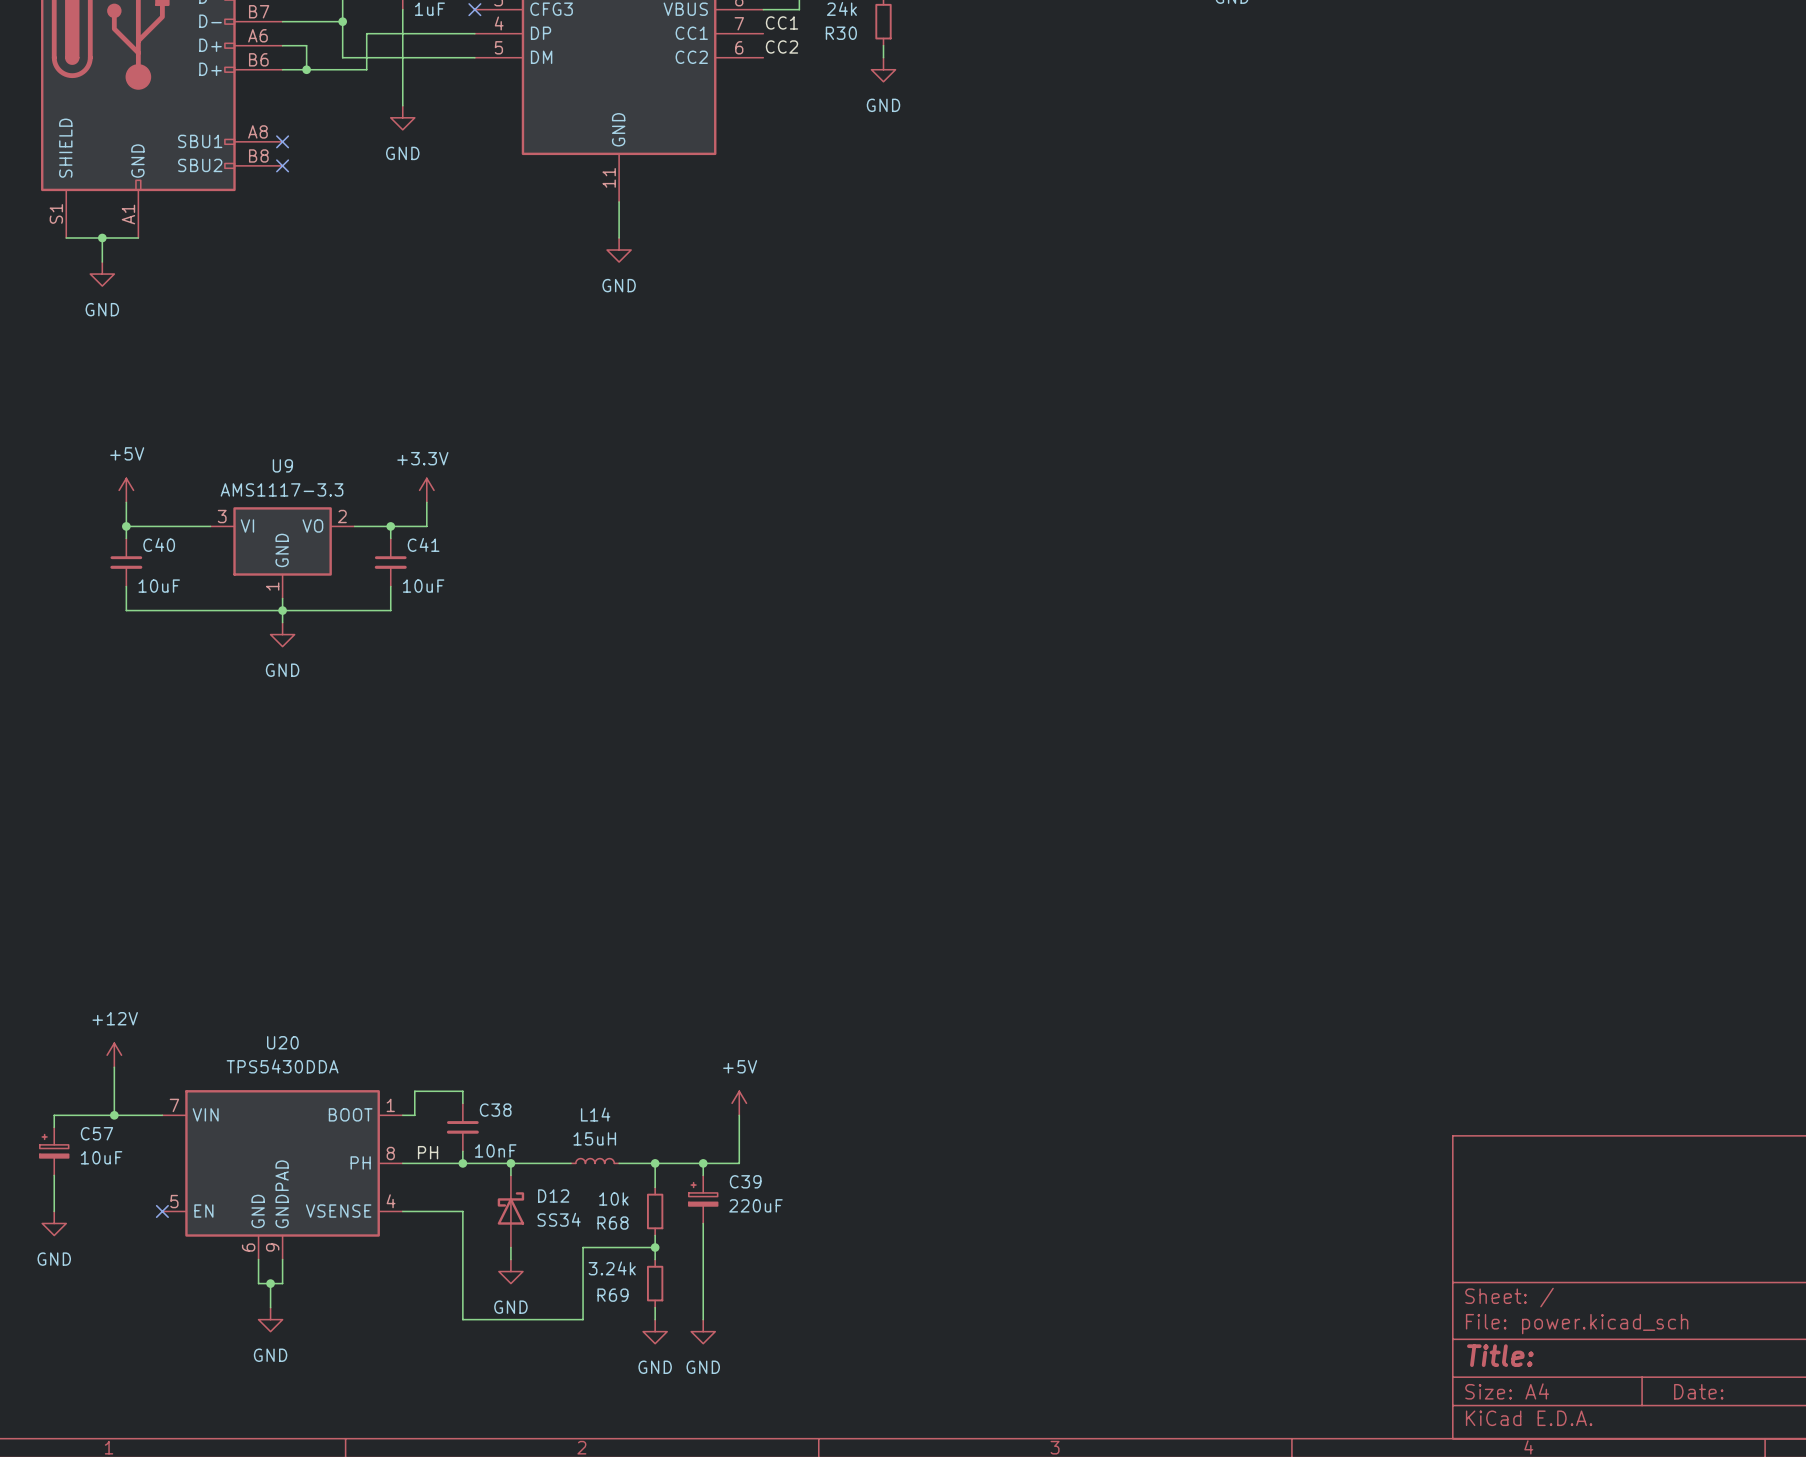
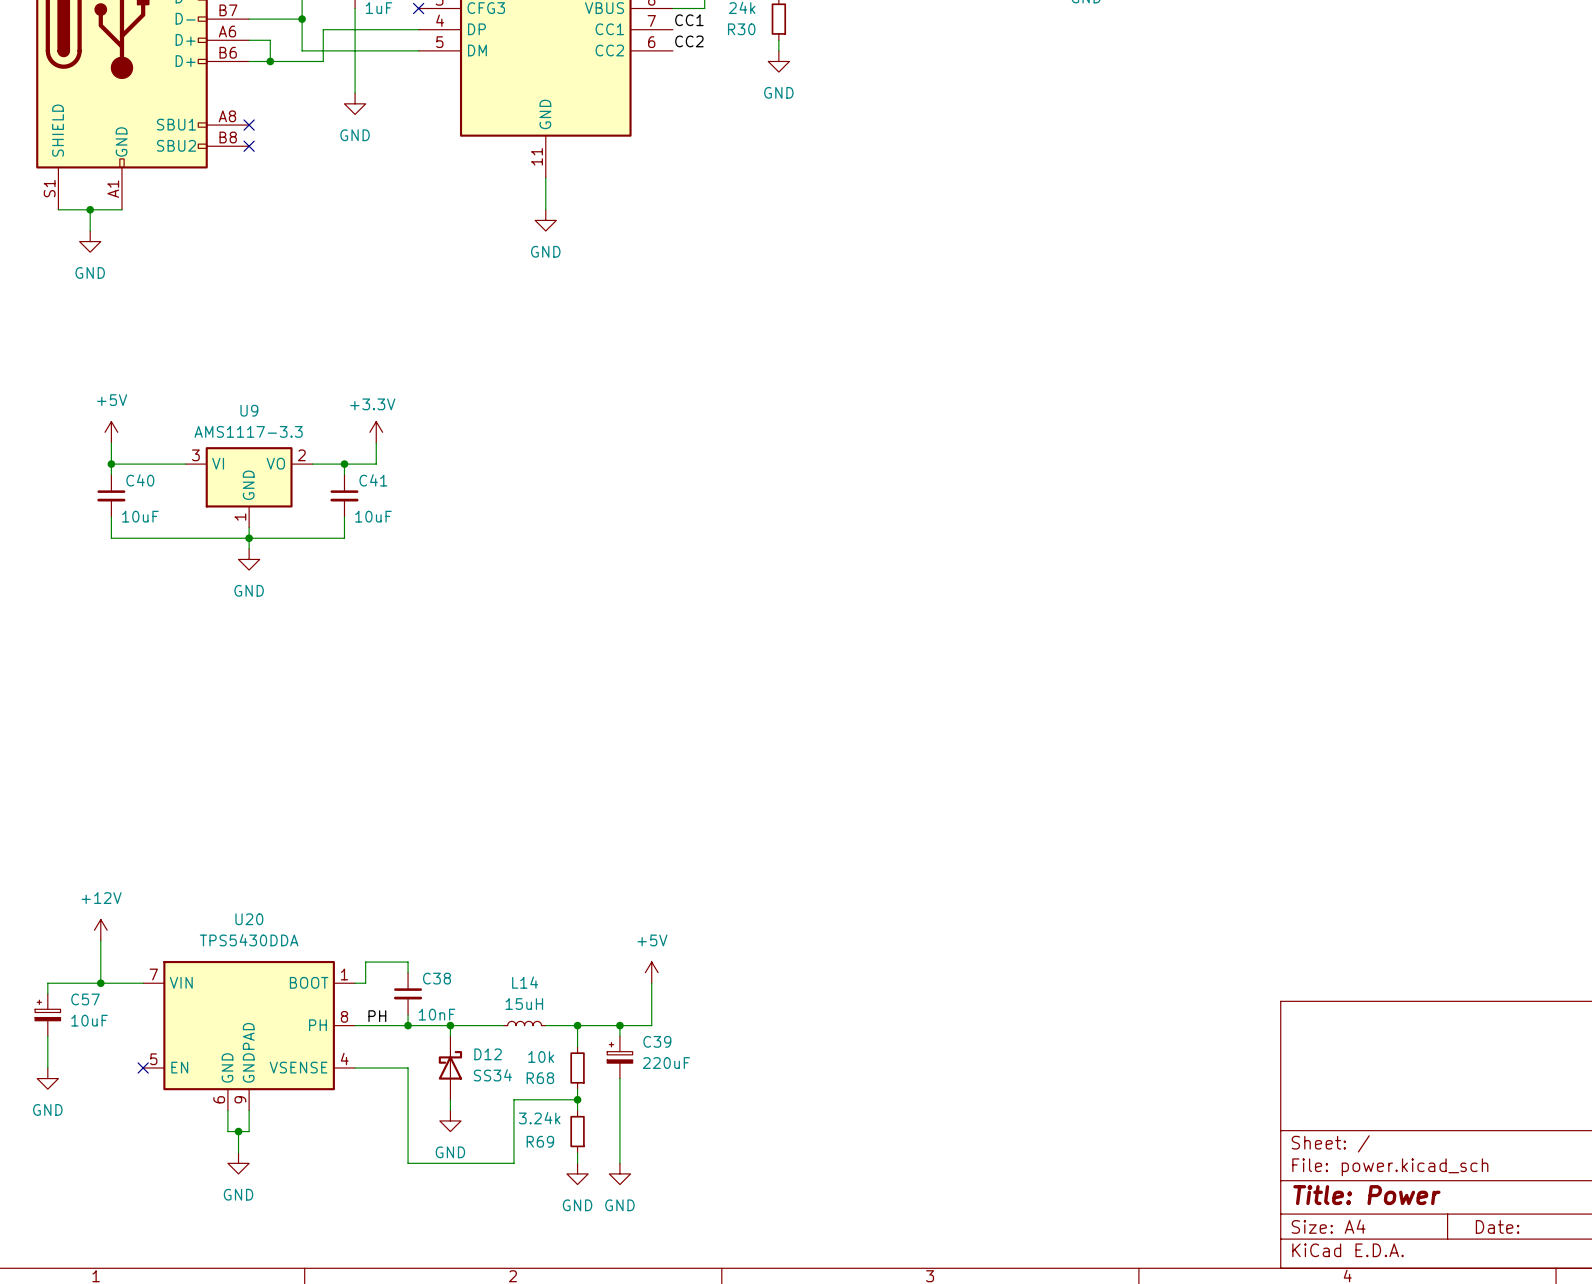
title block: Title: (1500, 1355) -> Title: Power (1366, 1195)

